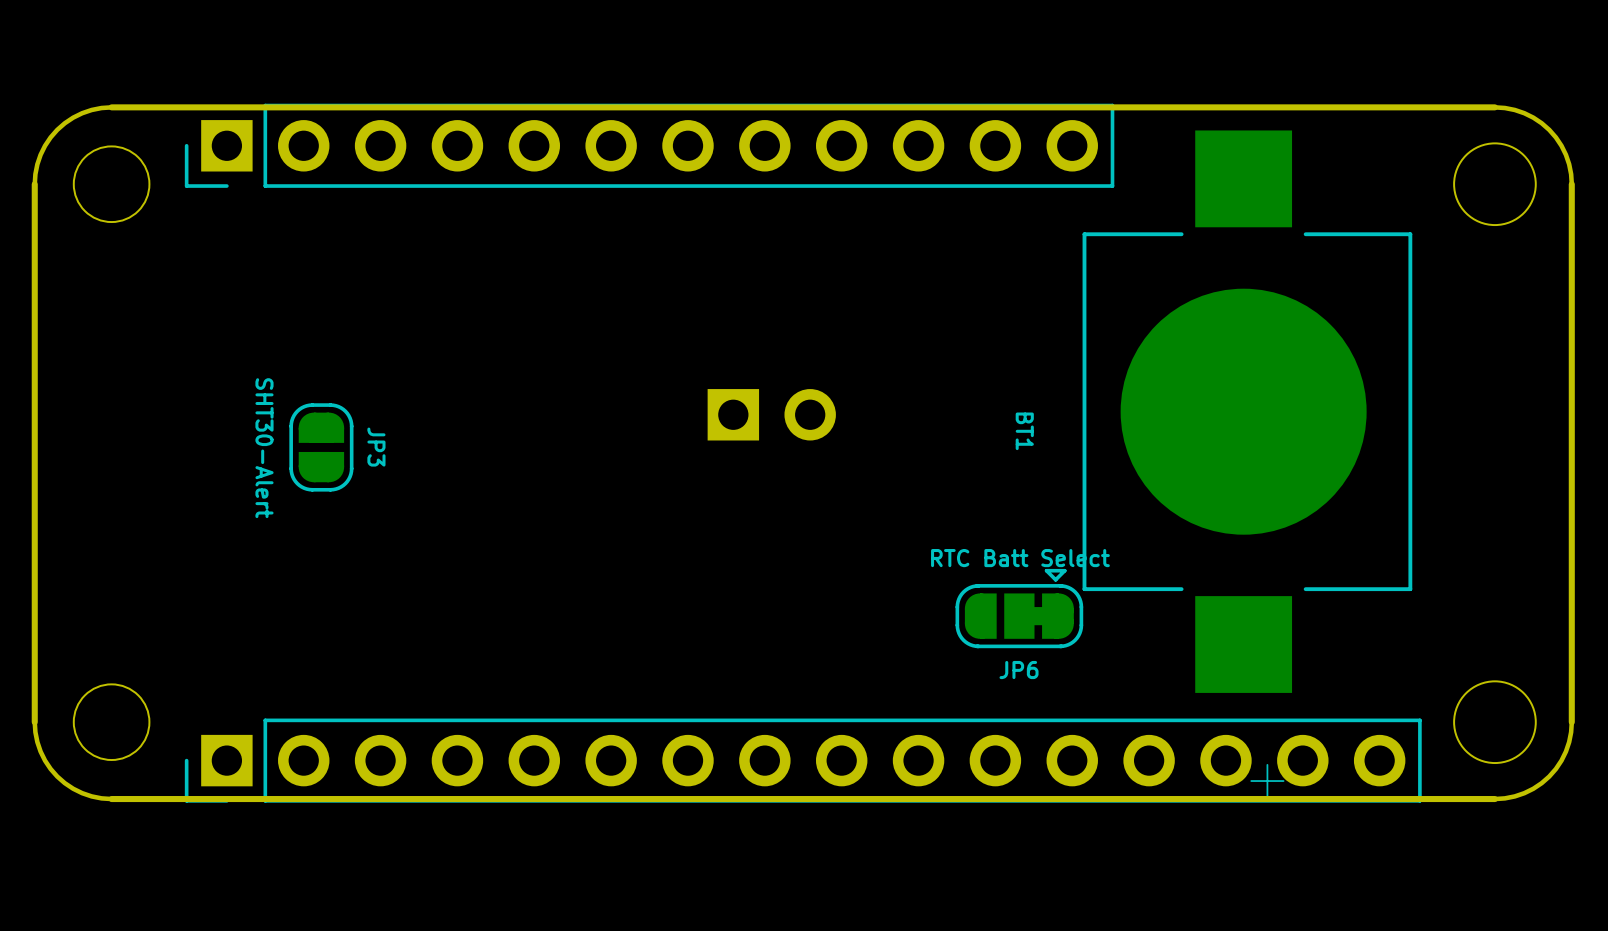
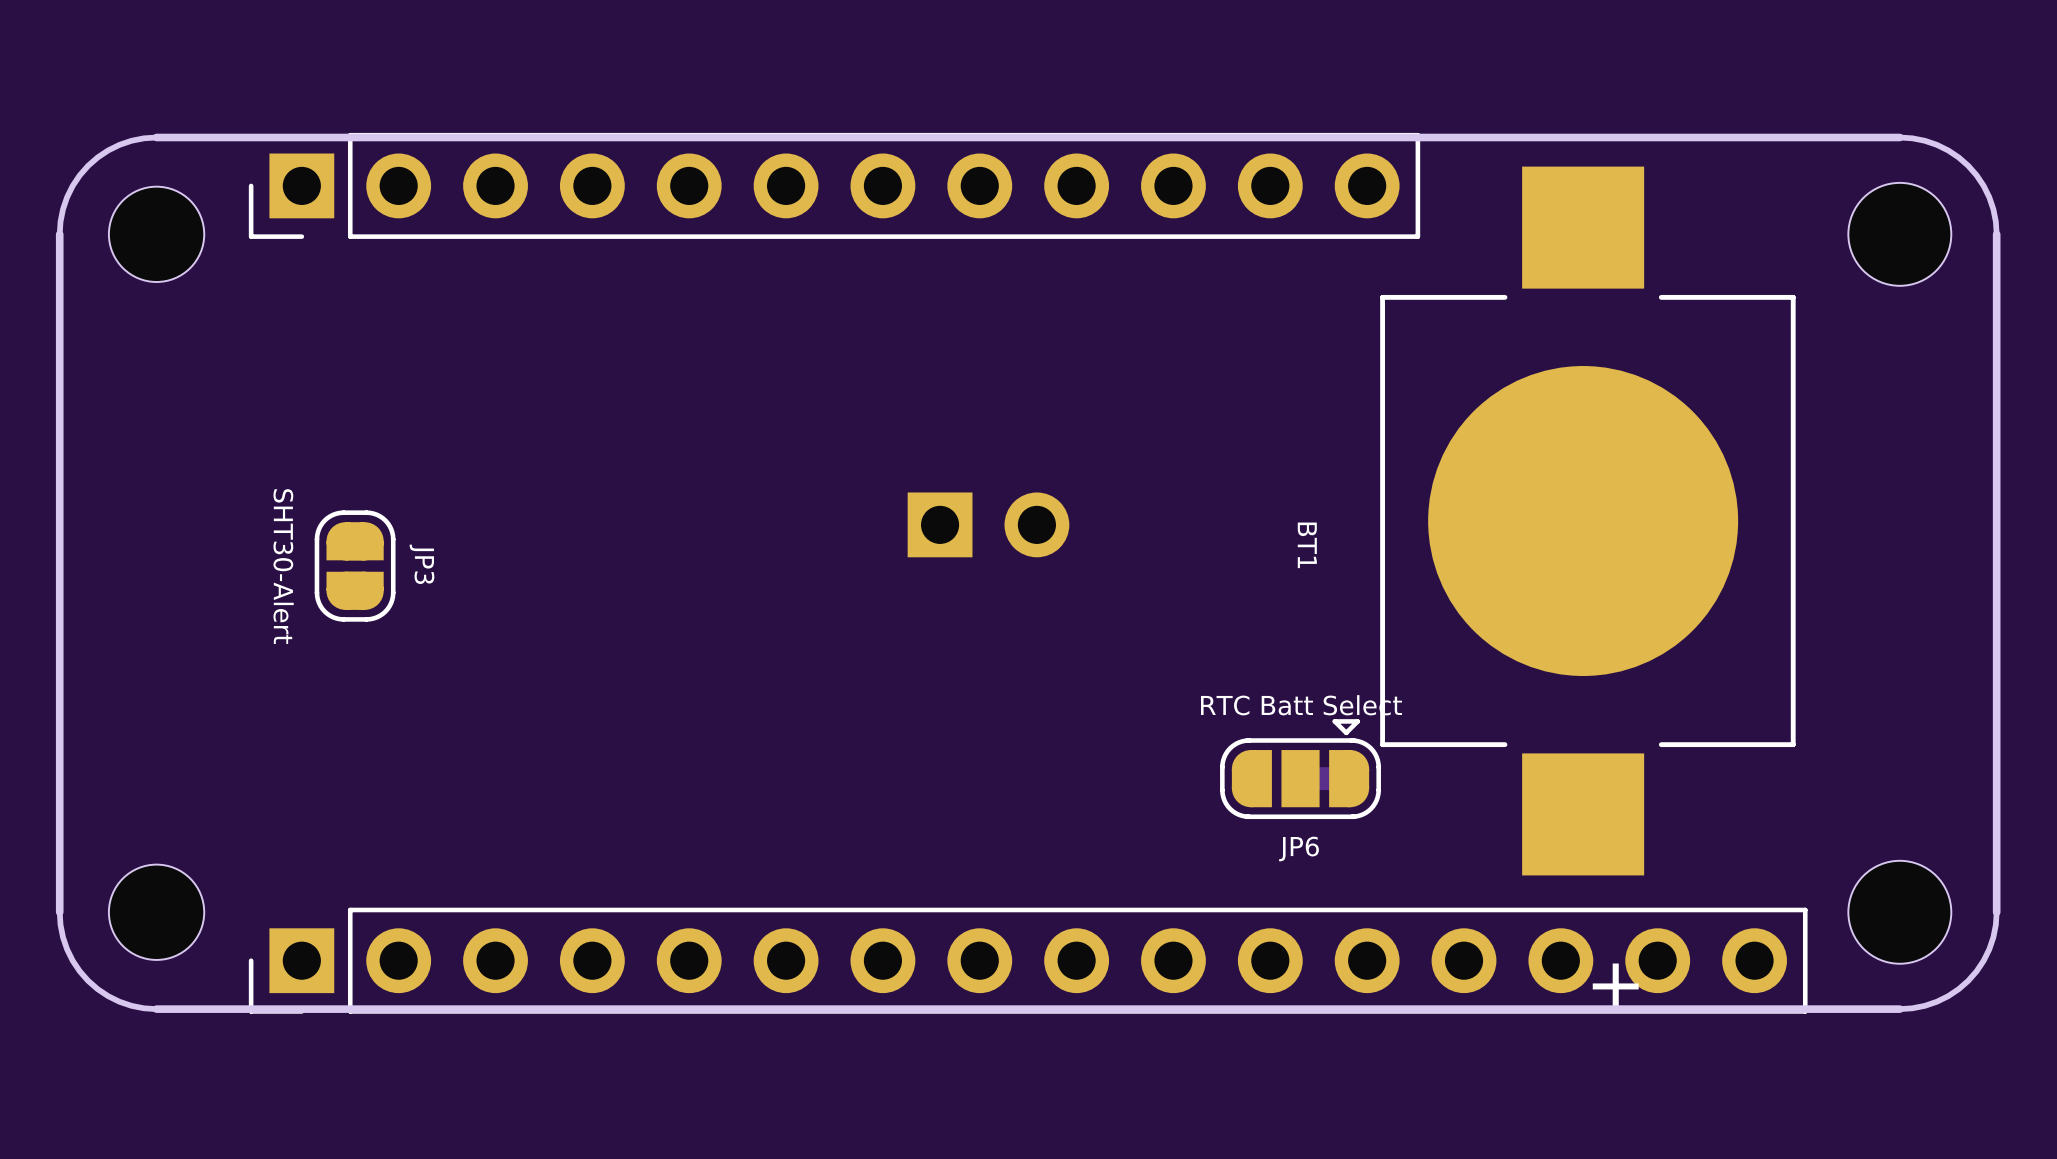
JP3 position: (321, 447) -> (355, 566)

